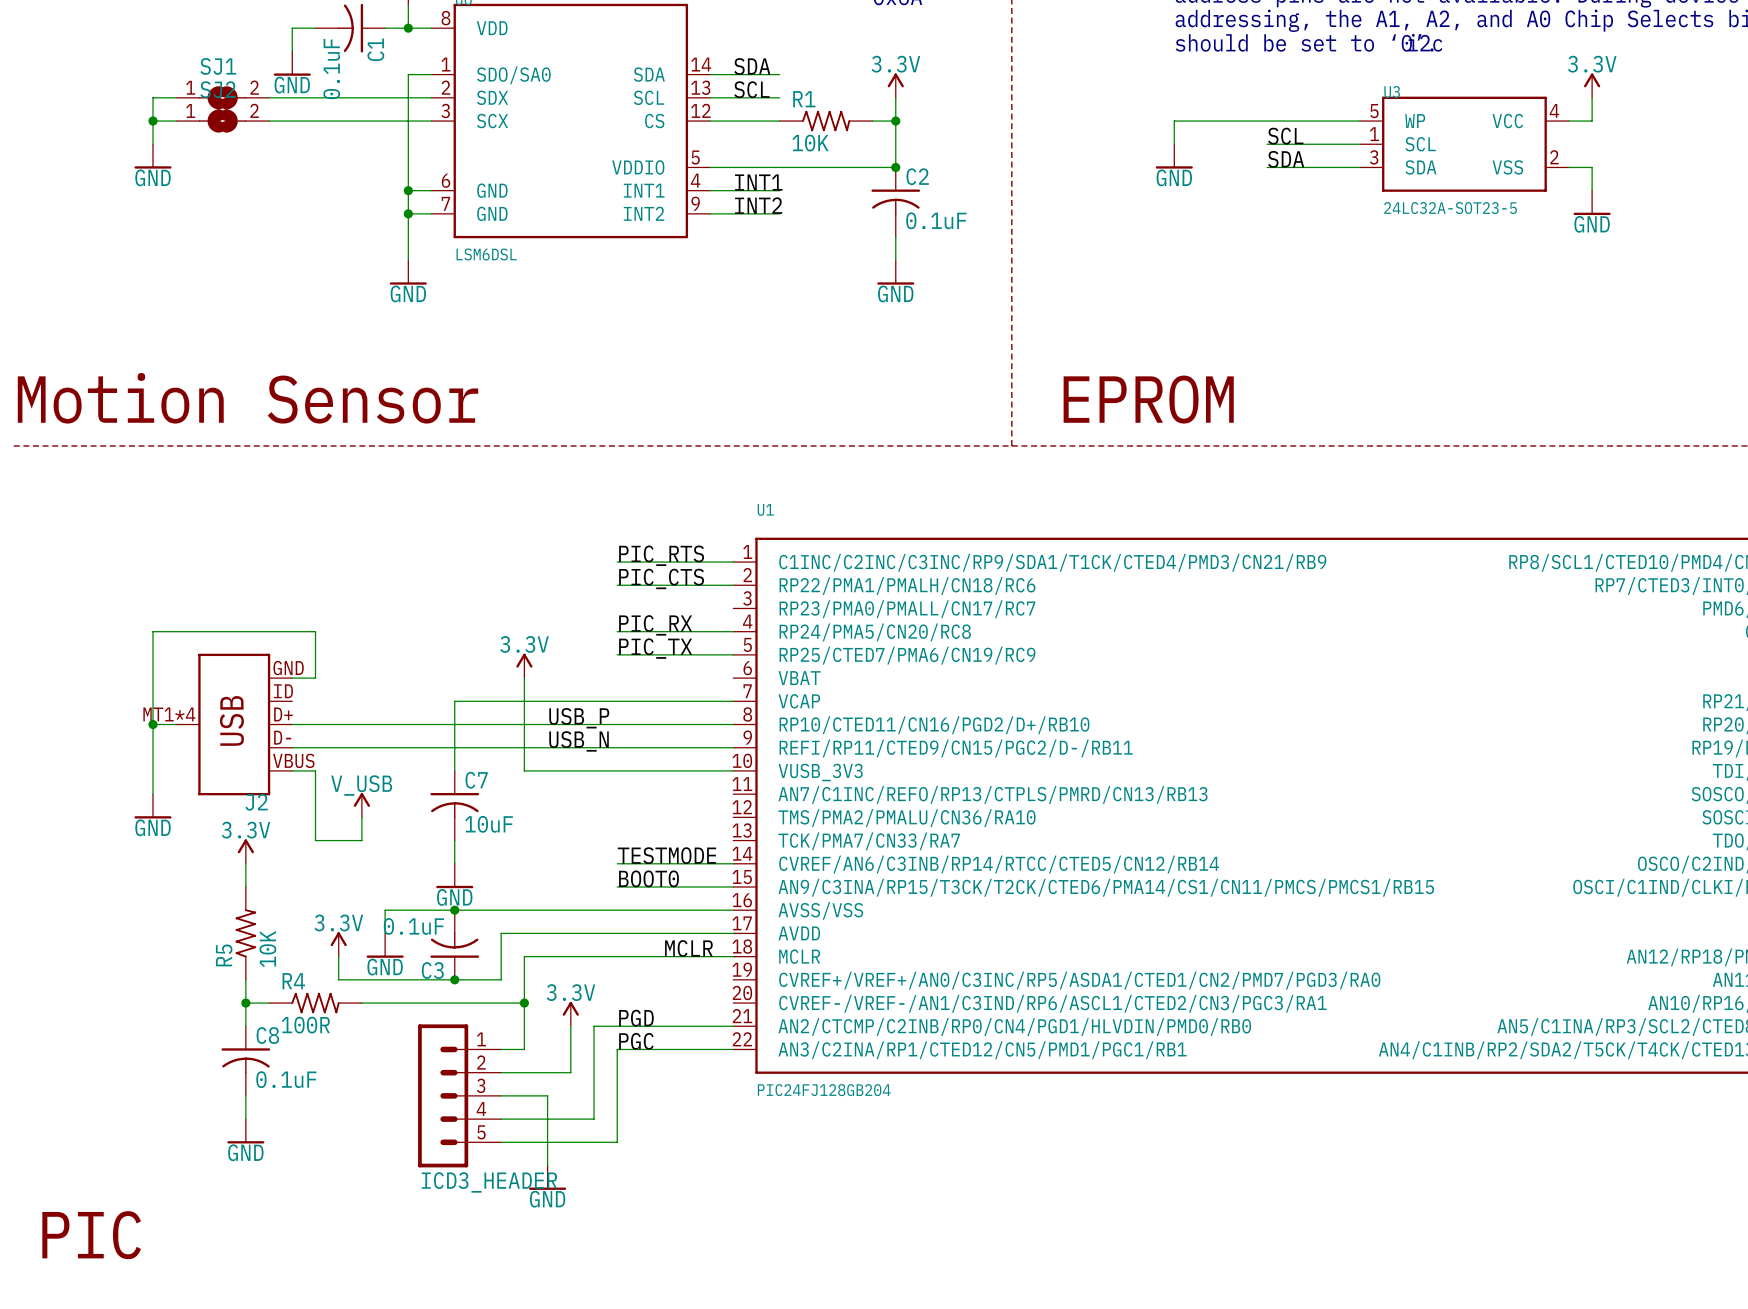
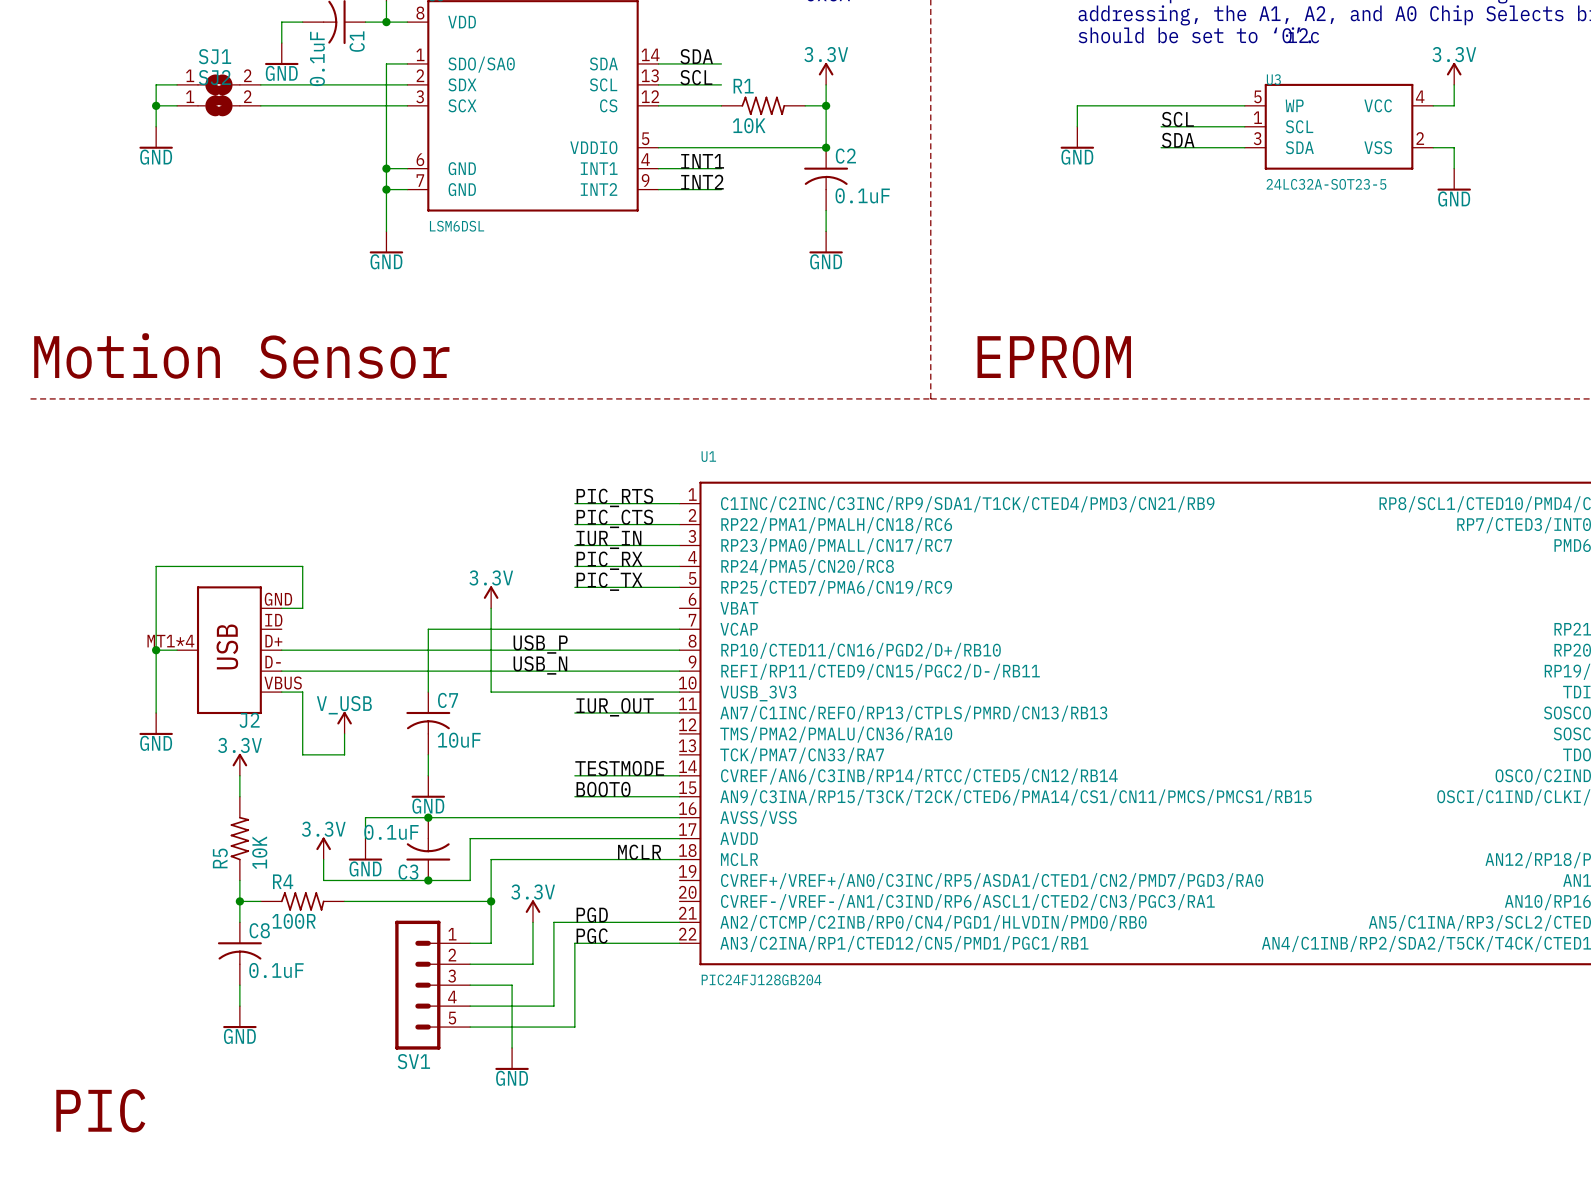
label: none -> IUR_IN (608, 539)
wire: none -> (574, 545) (679, 545)
label: none -> IUR_OUT (615, 707)
wire: none -> (574, 712) (679, 712)
ICD3_HEADER name: ICD3_HEADER (489, 1182) -> SV1 (413, 1061)

